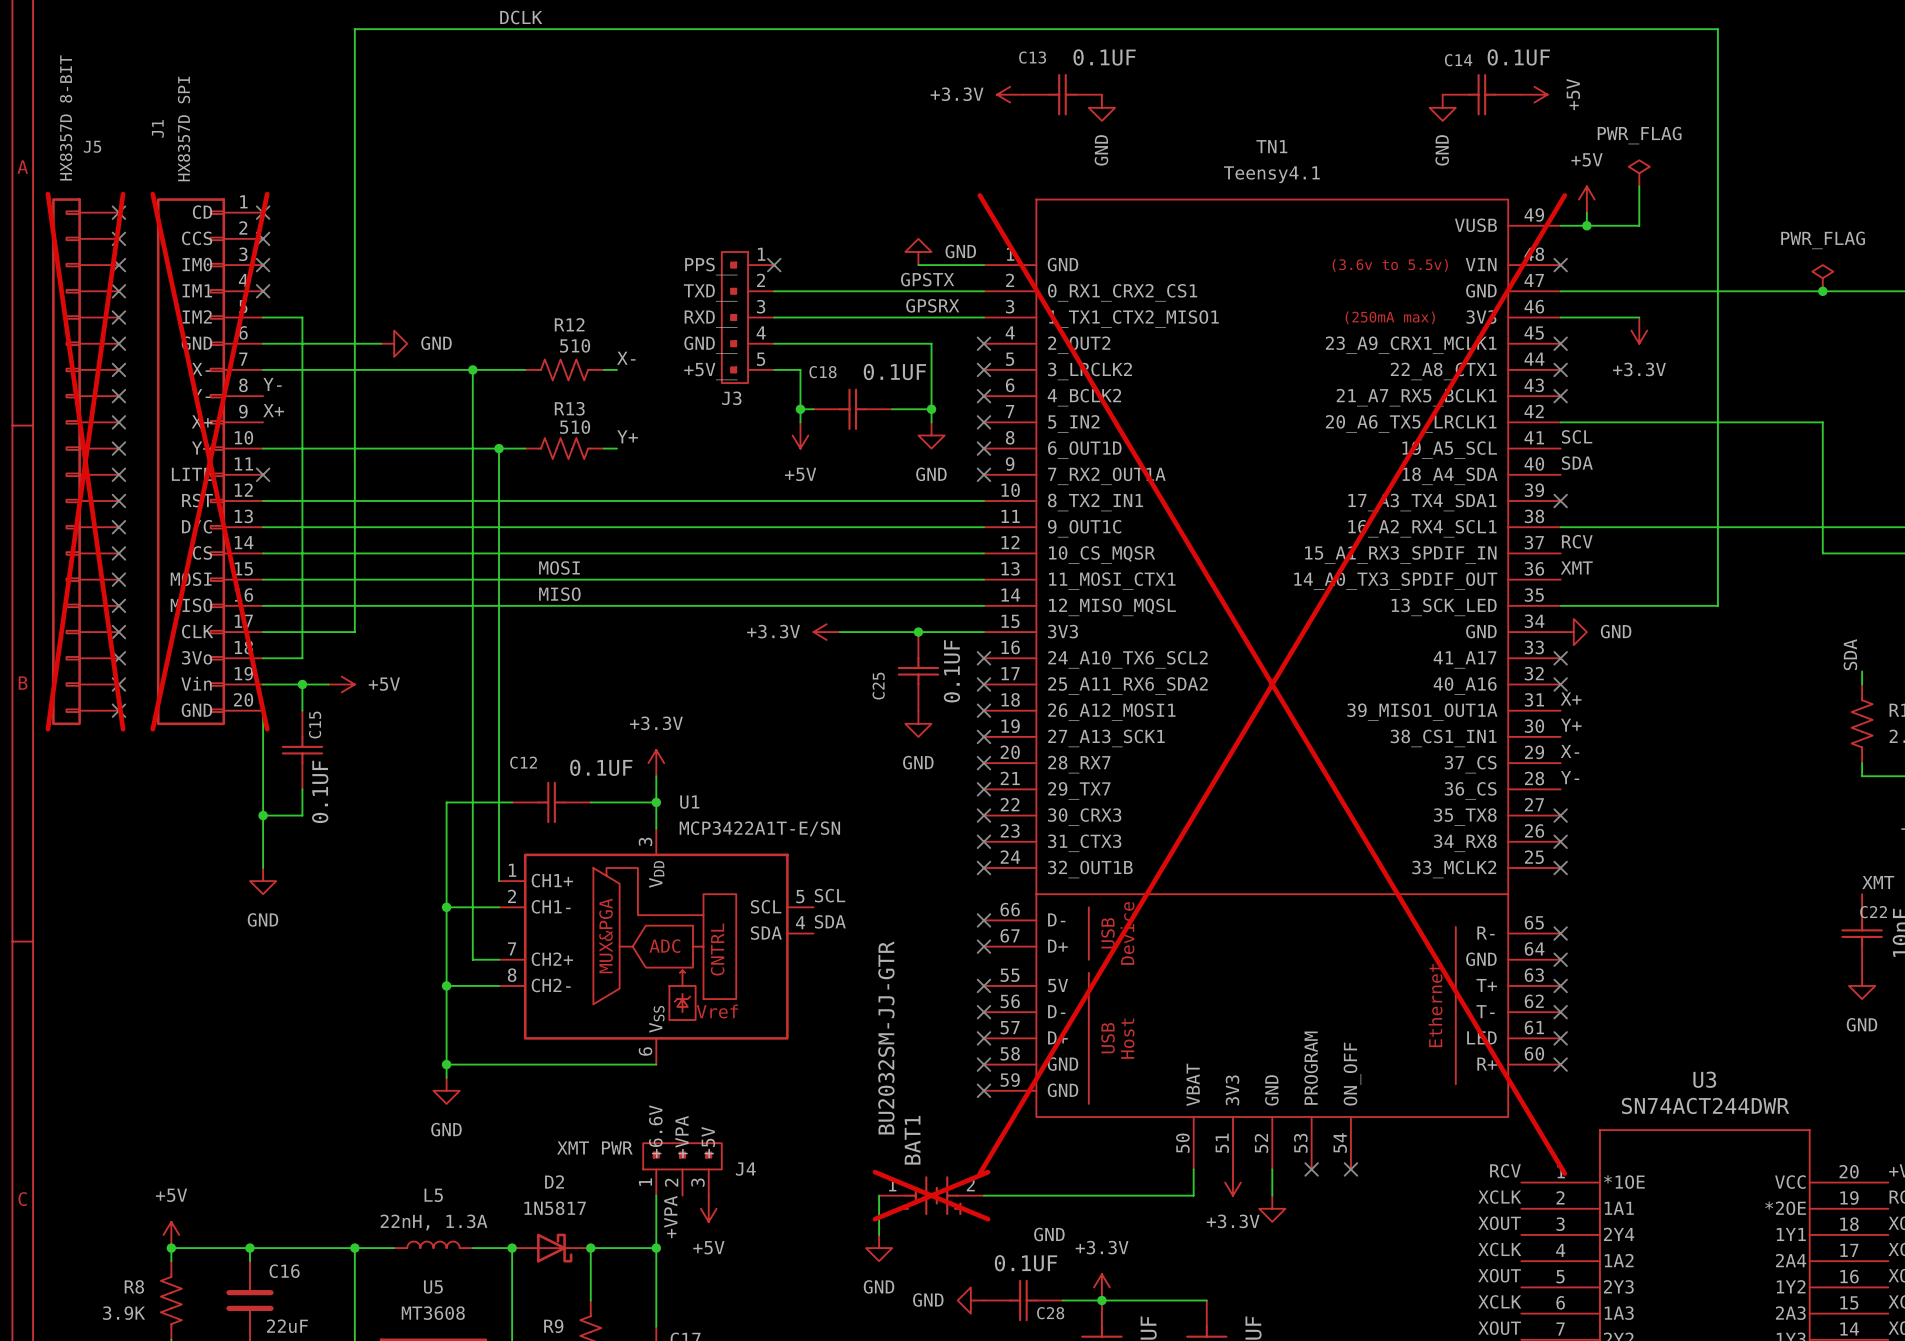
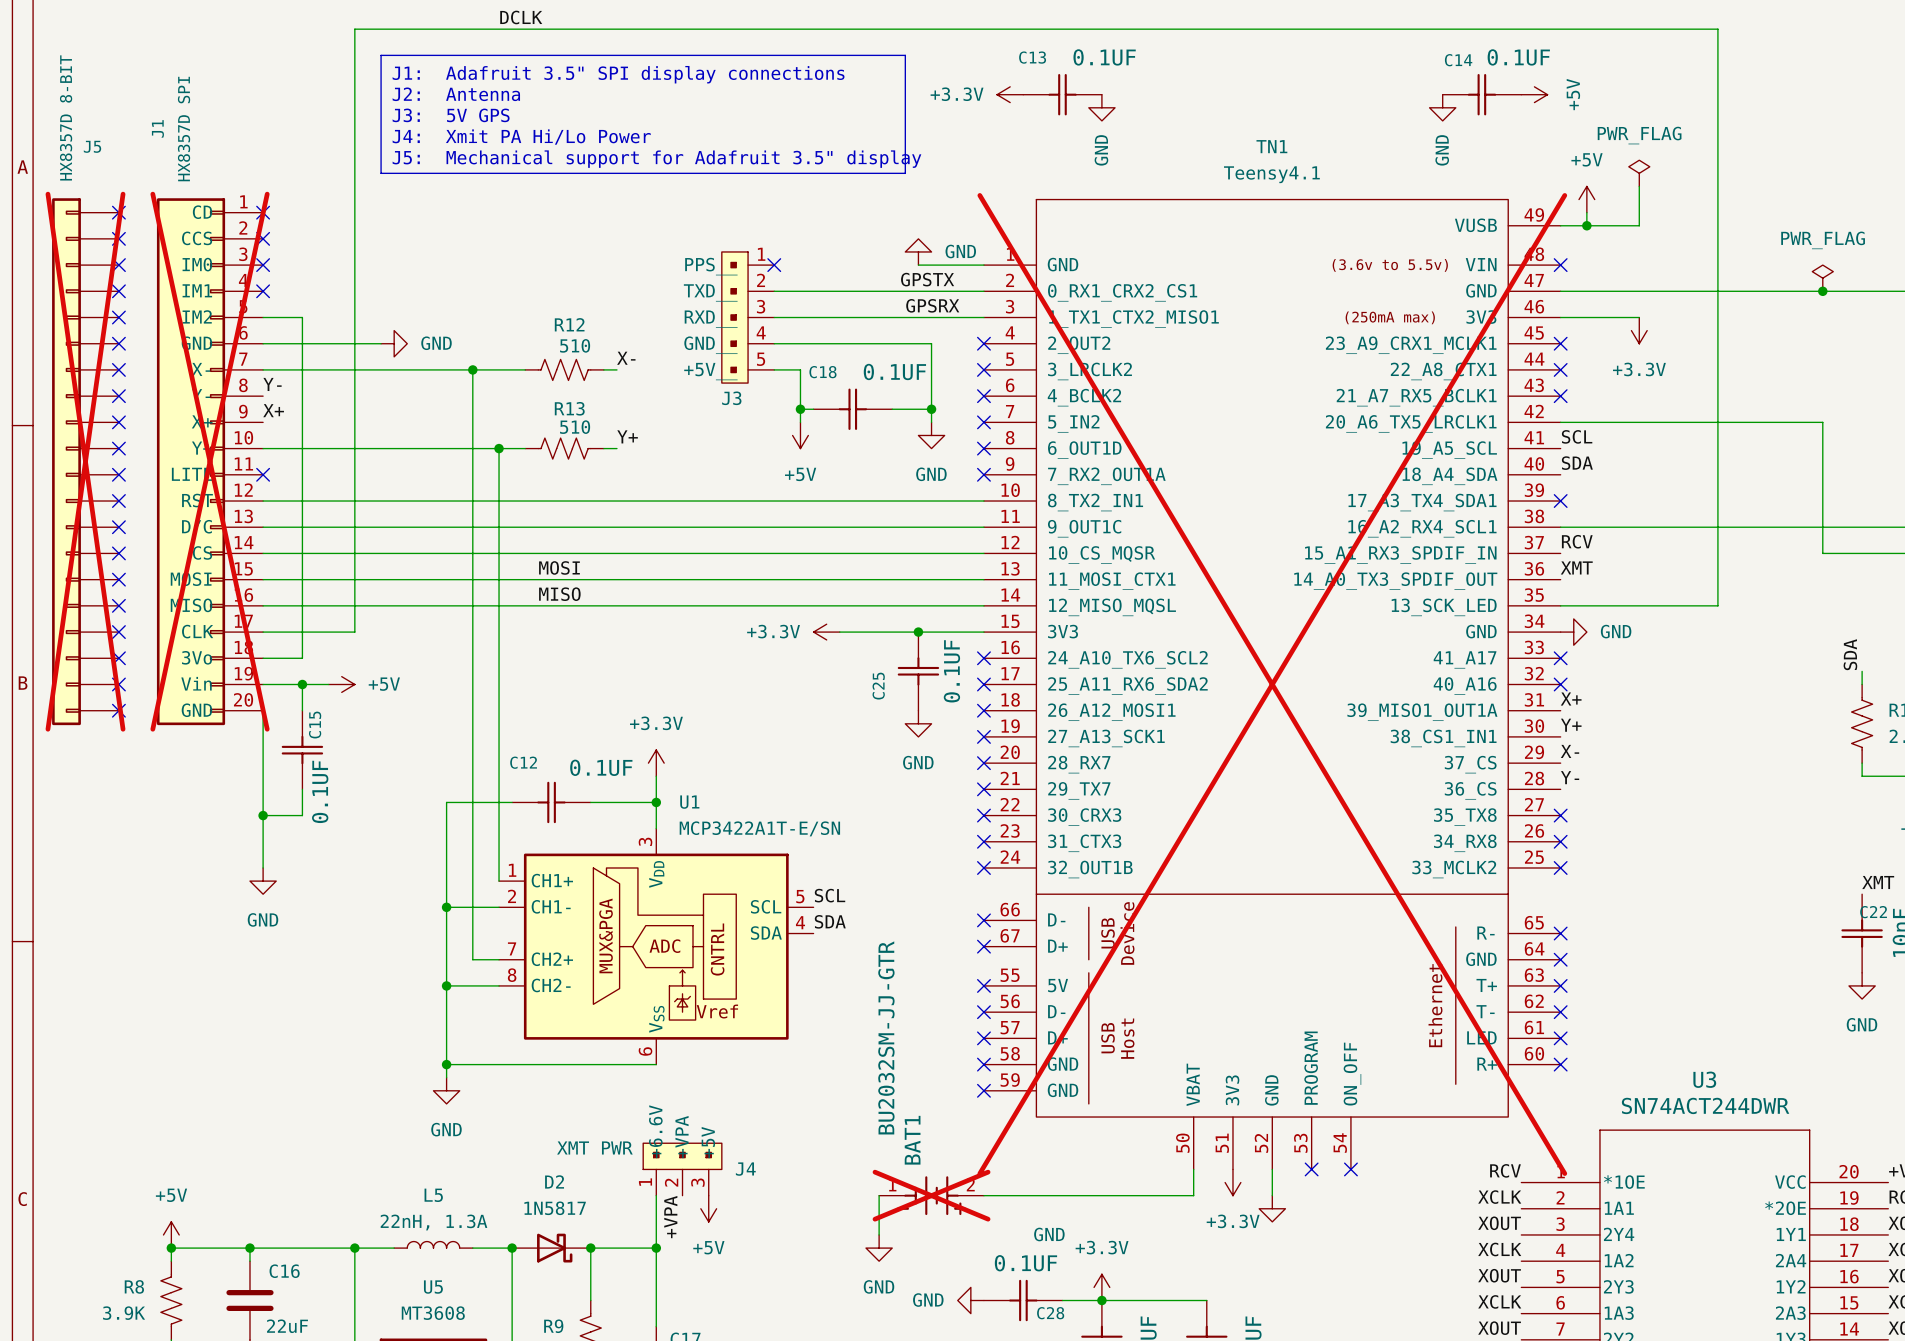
line: none -> (381, 55) (905, 55) (905, 173) (381, 173) (381, 55)
text: none -> J1: Adafruit 3.5" SPI display connections (618, 74)
text: none -> J2: Antenna (456, 94)
text: none -> J3: 5V GPS (451, 115)
text: none -> J4: Xmit PA Hi/Lo Power (521, 137)
text: none -> J5: Mechanical support for Adafruit 3.5" display (656, 159)

